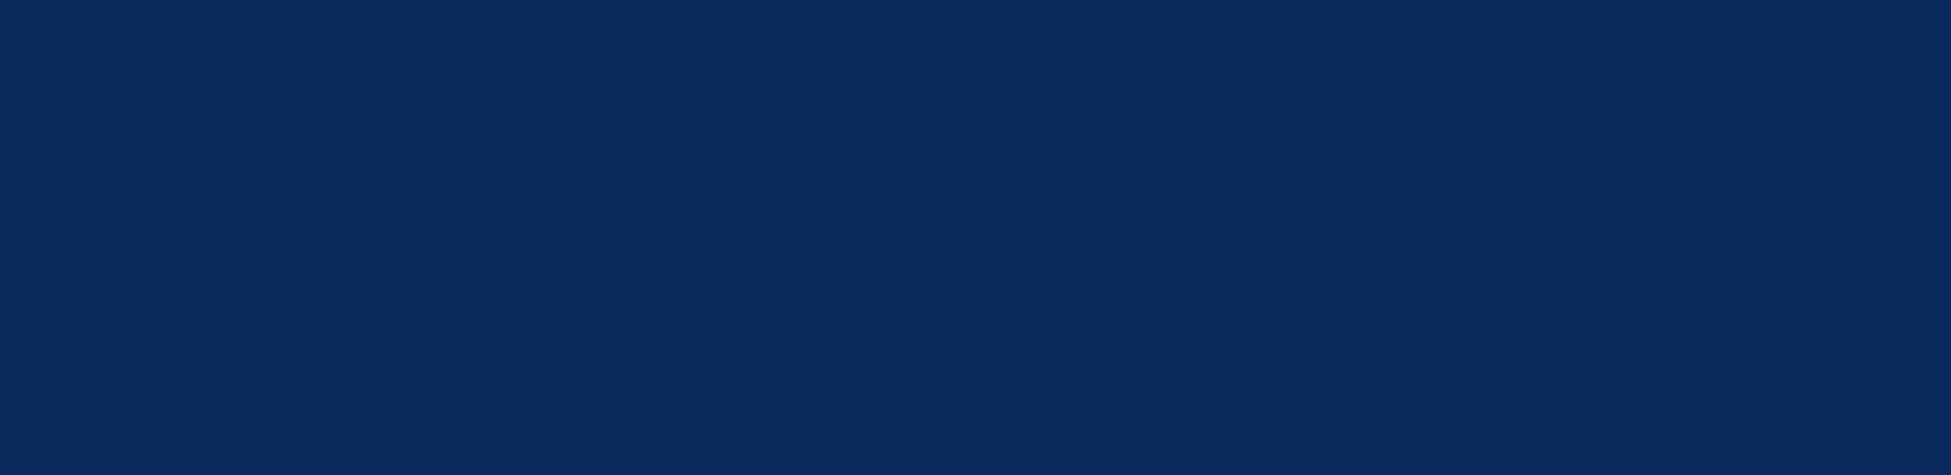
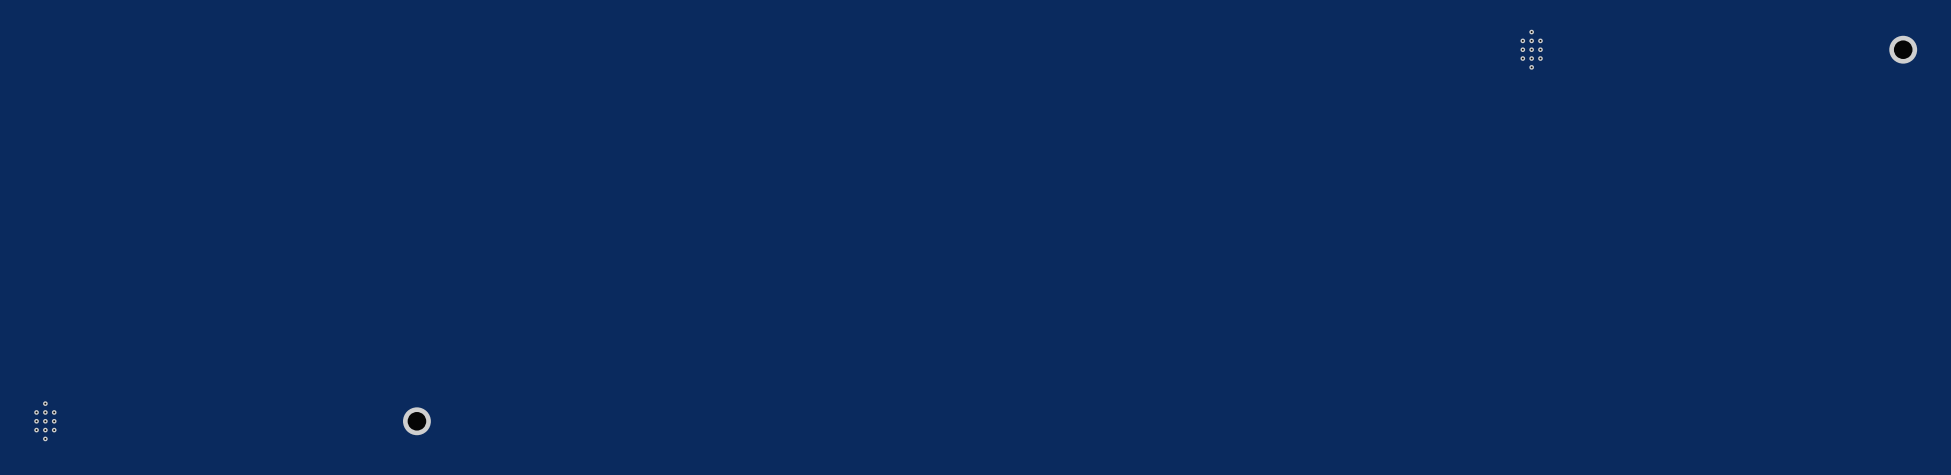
part: none -> (1531, 49)
part: none -> (1903, 49)
part: none -> (45, 421)
part: none -> (416, 421)

